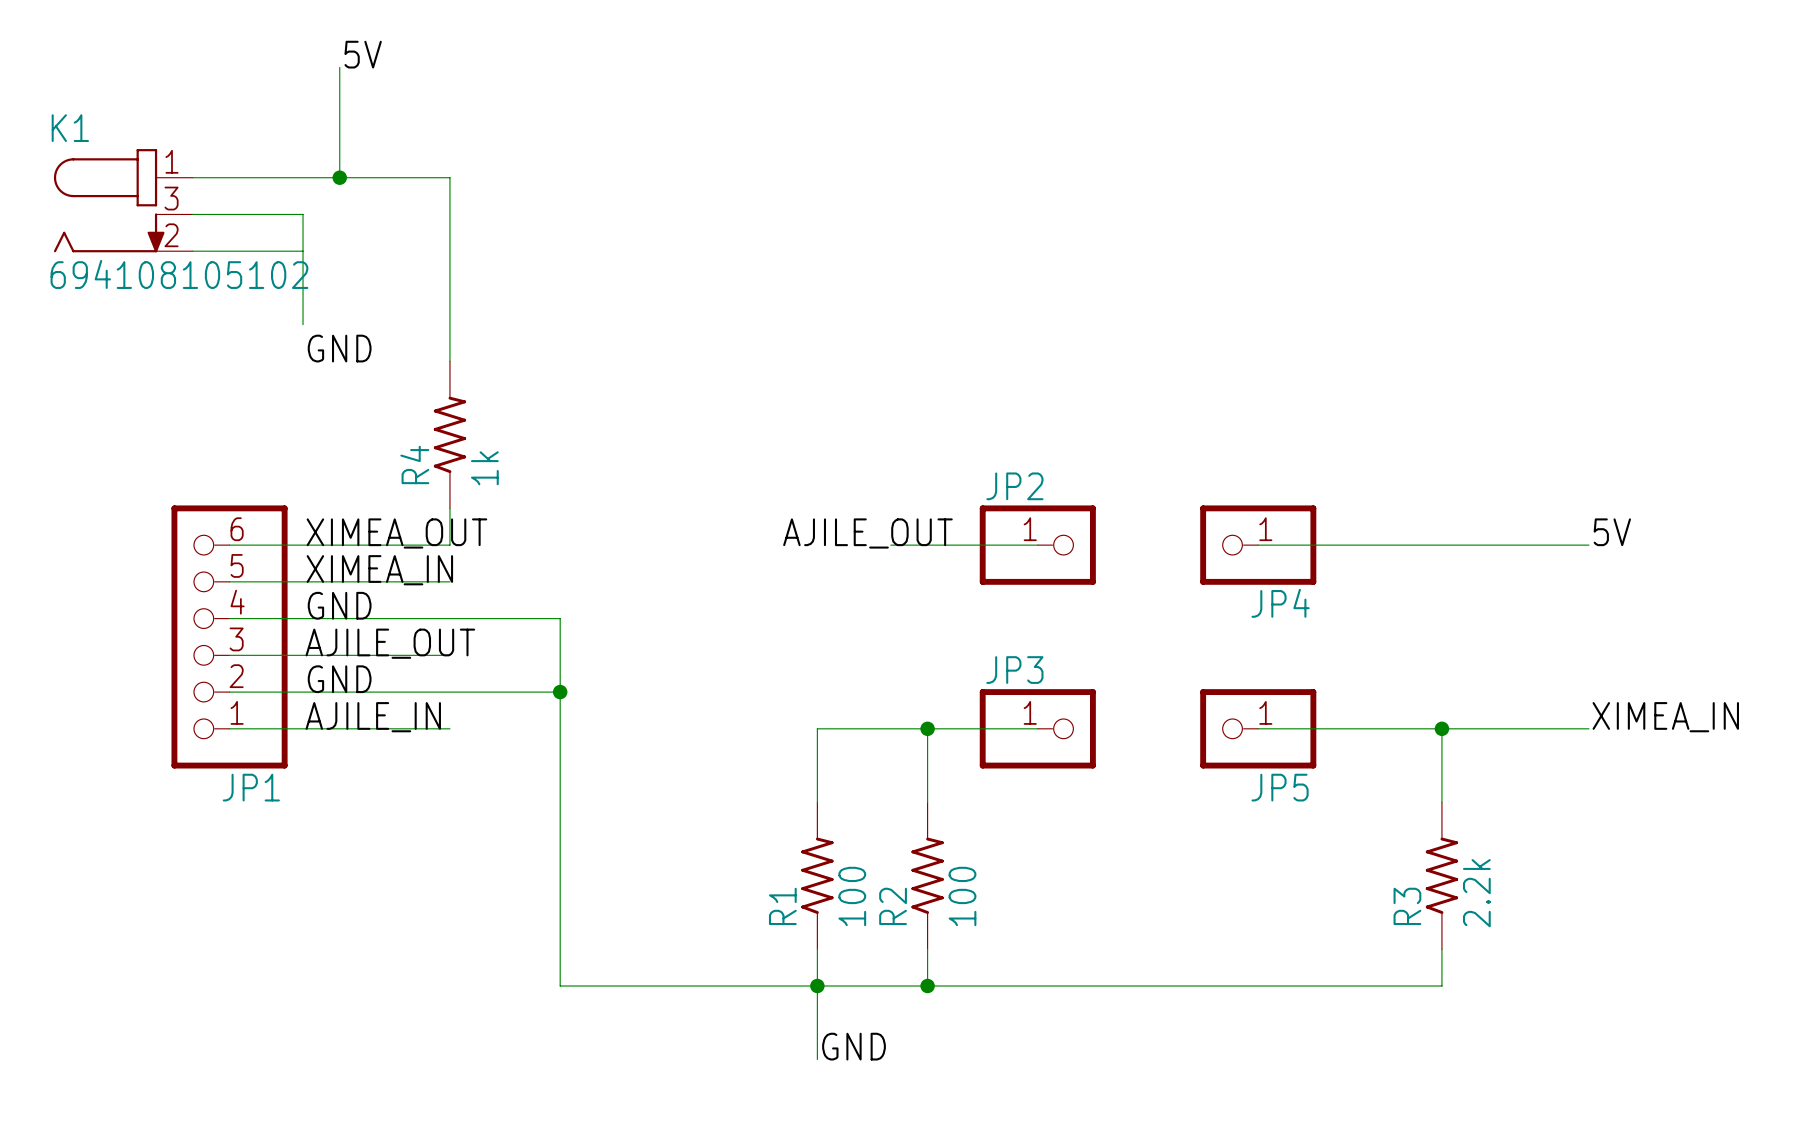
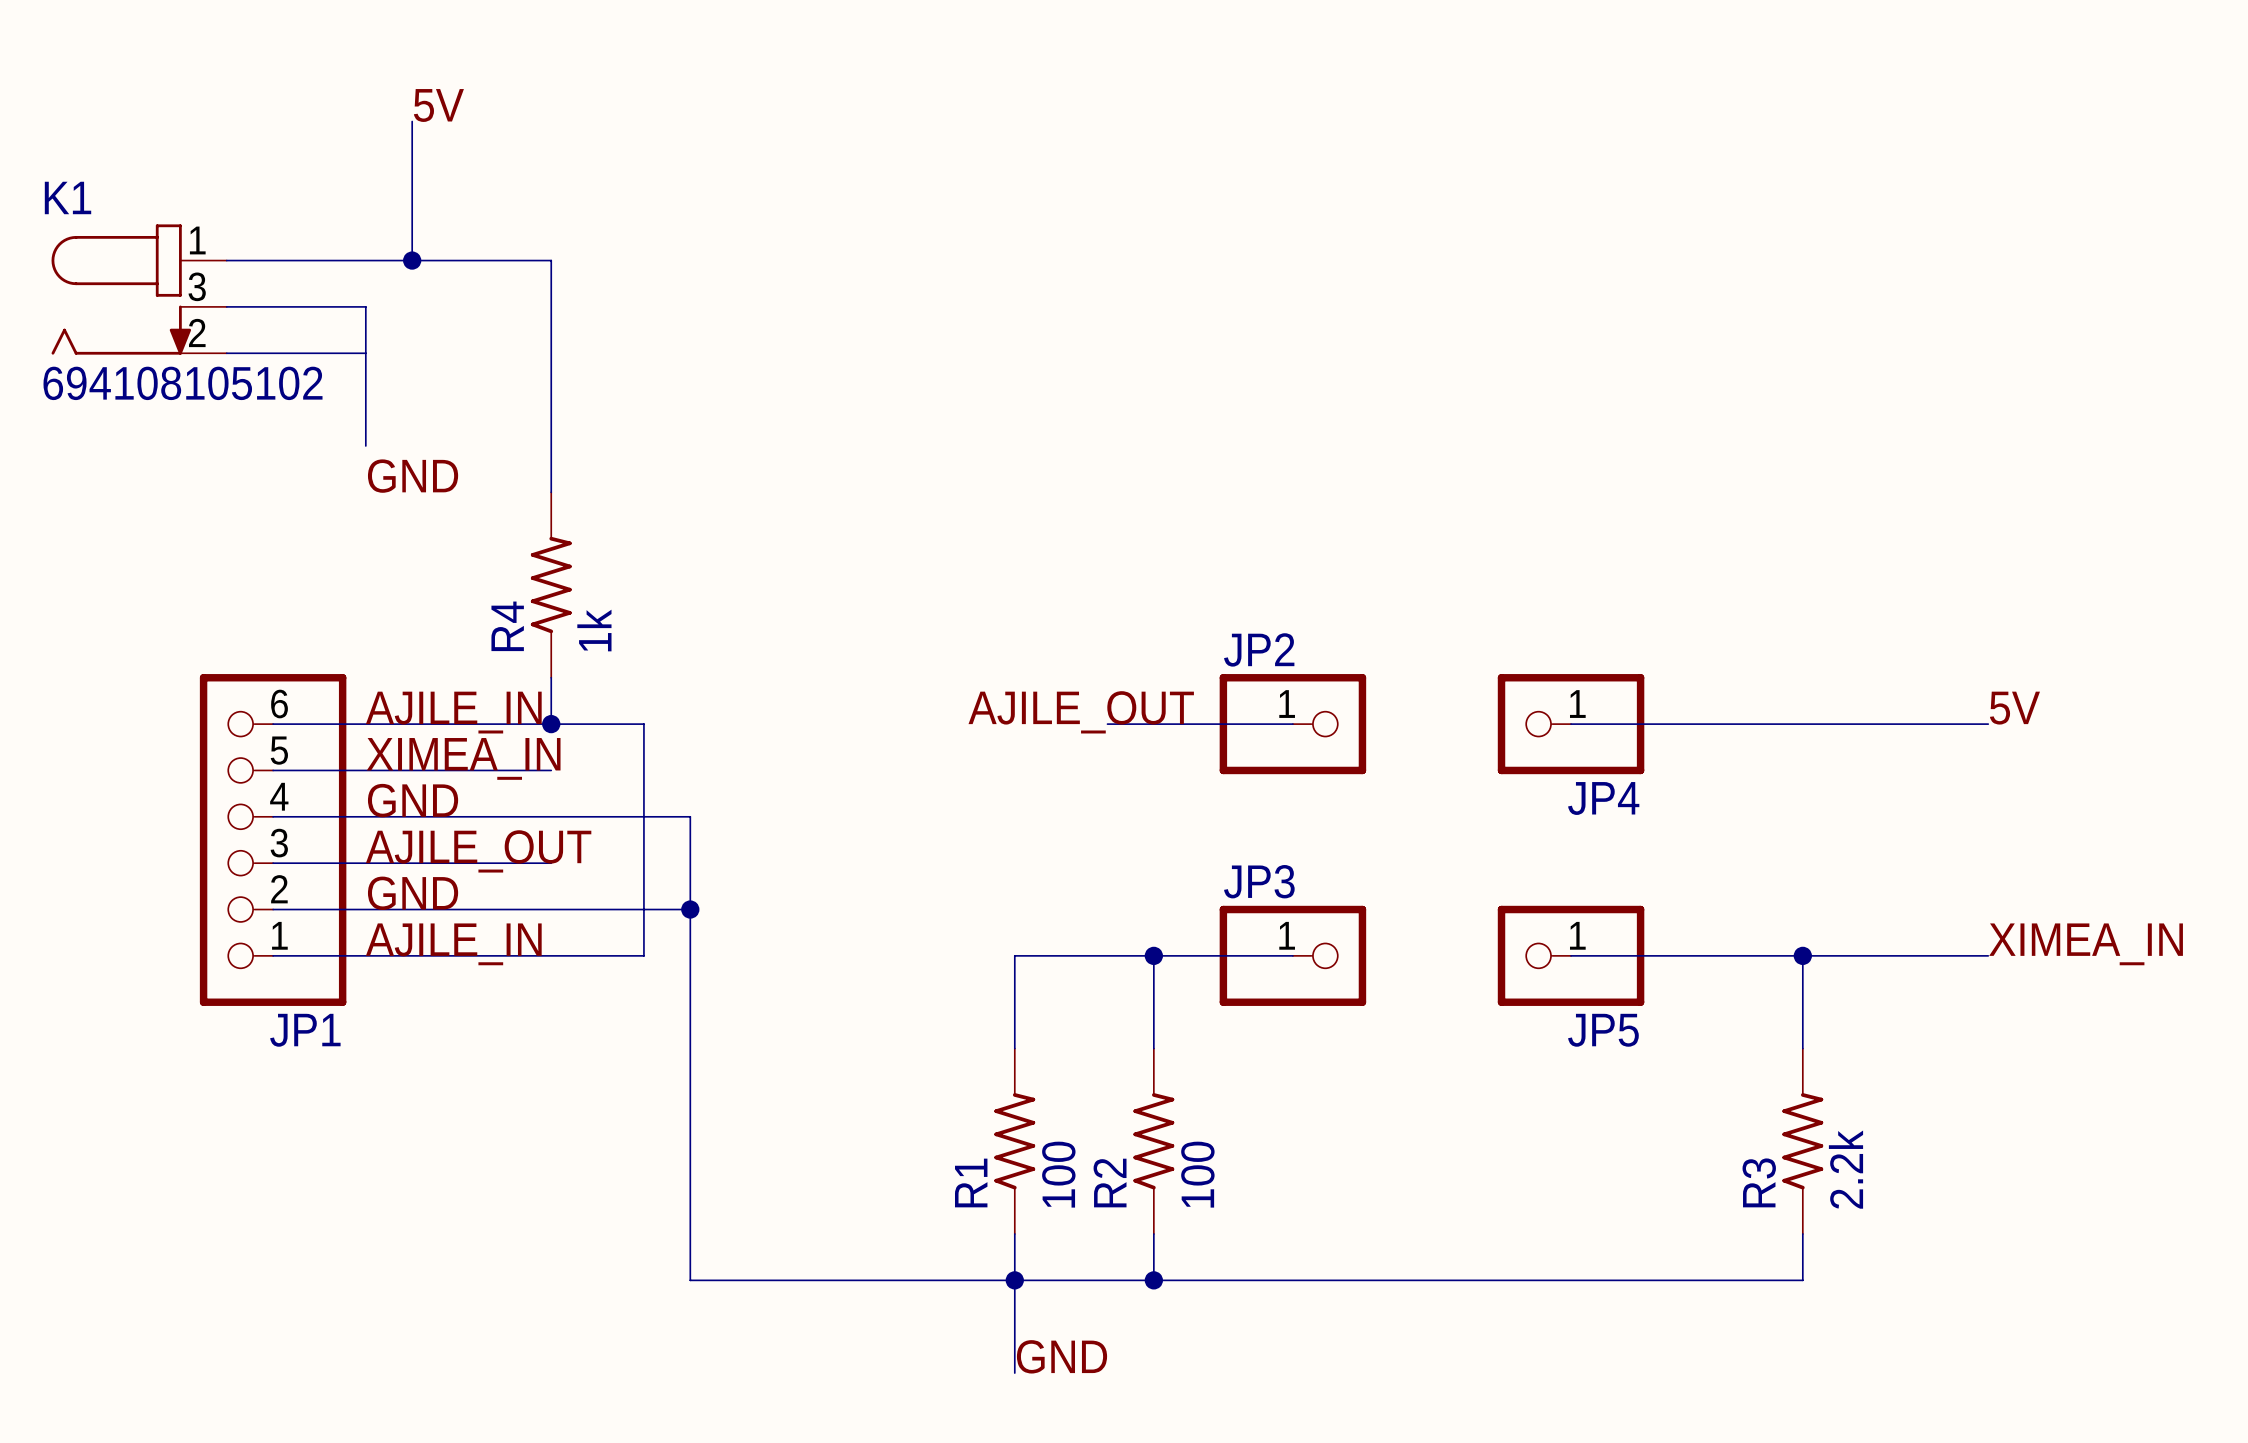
label: XIMEA_OUT (396, 533) -> AJILE_IN (453, 712)
wire: none -> (551, 724) (643, 724) (643, 955) (551, 955)
junction: none -> (551, 724)

